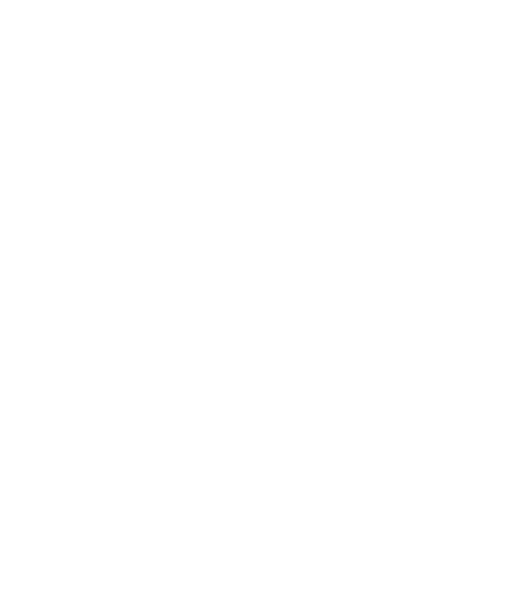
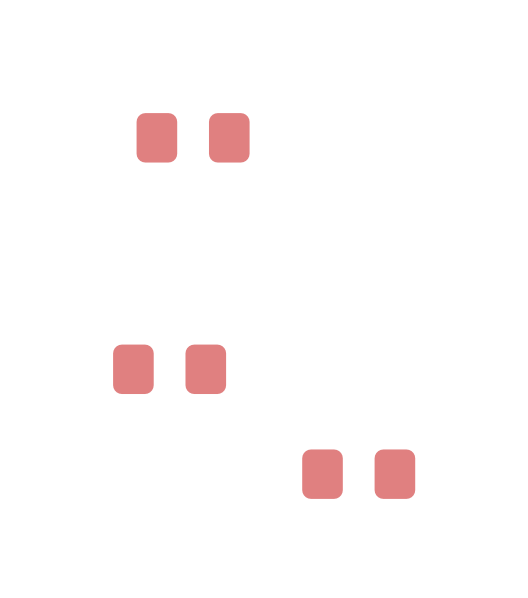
part: none -> (193, 137)
part: none -> (169, 369)
part: none -> (358, 474)

